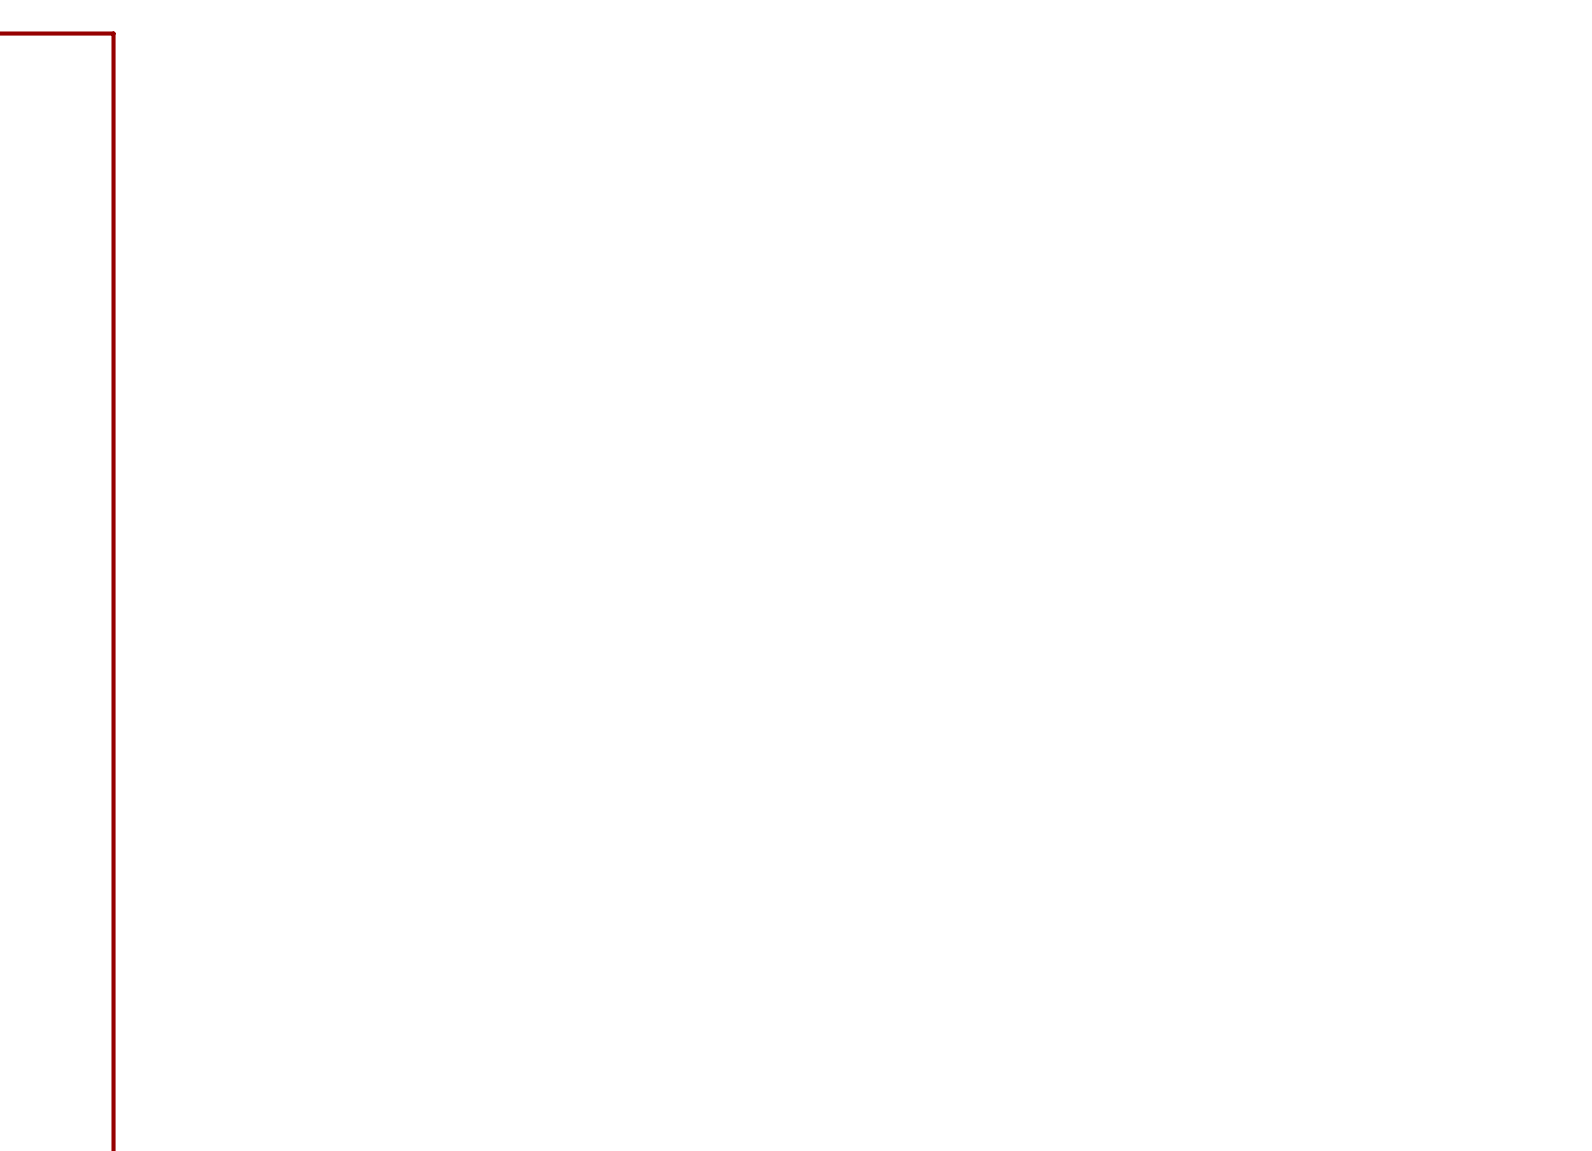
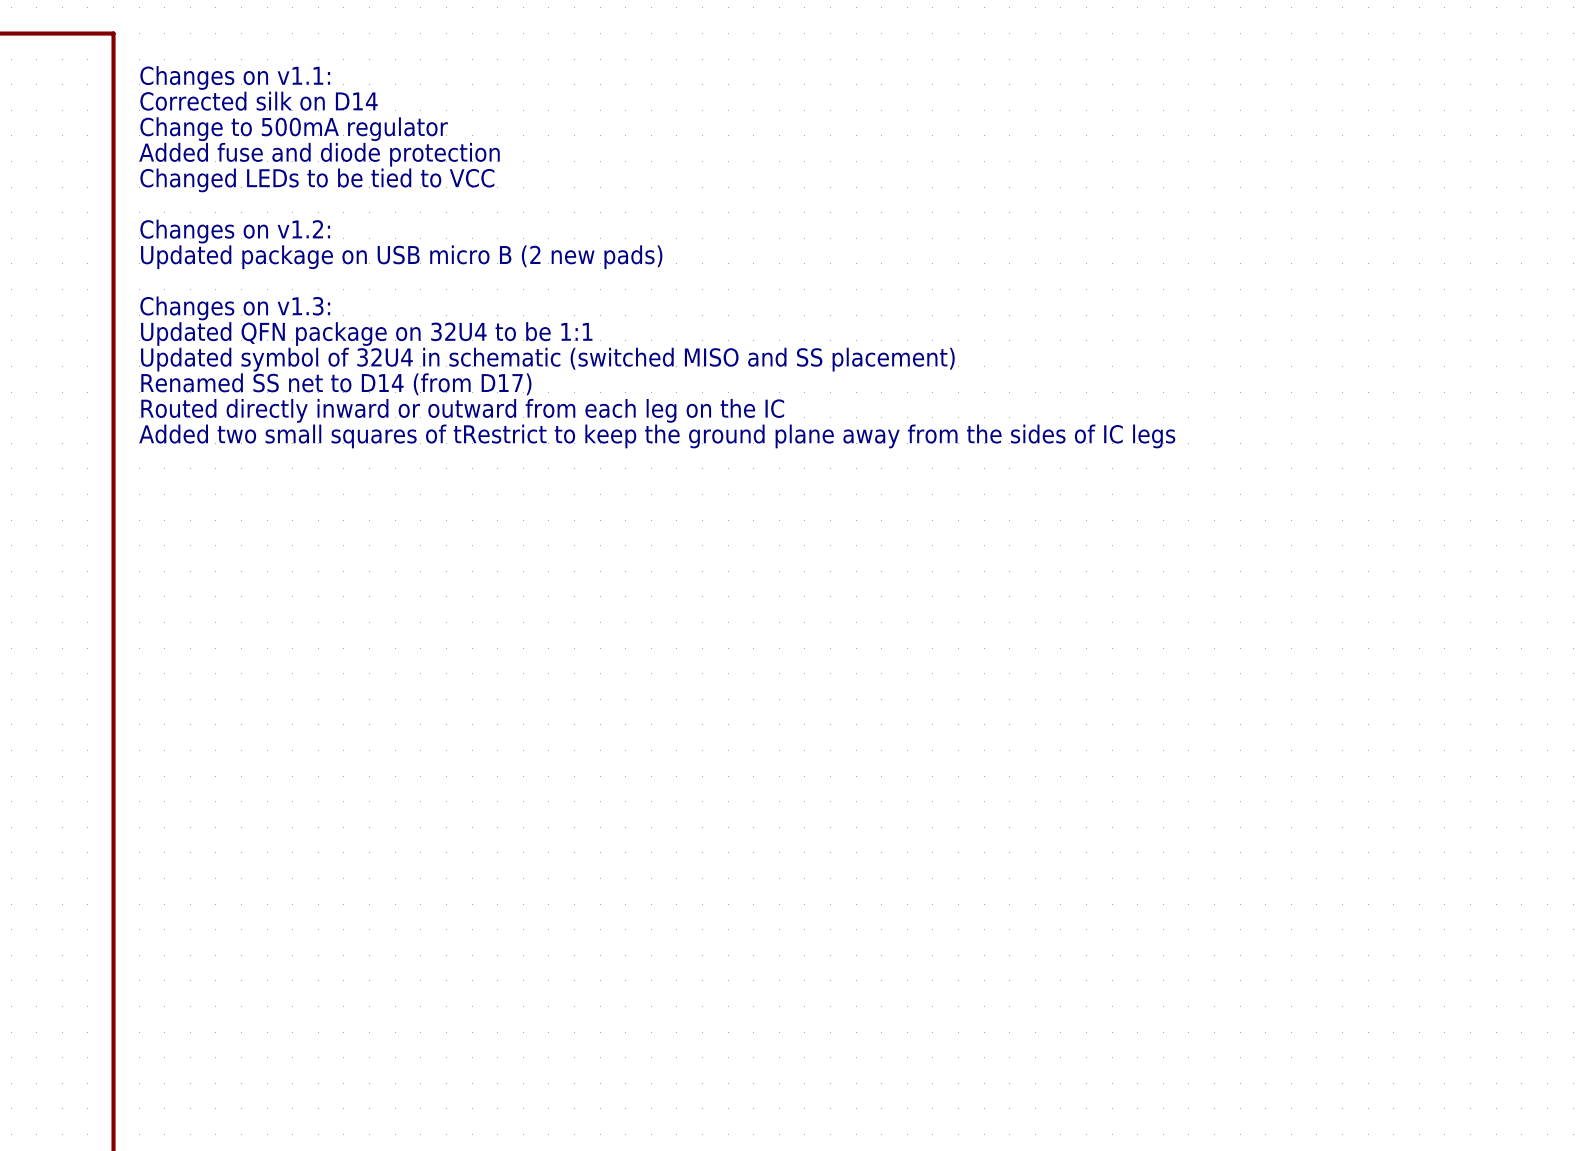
text: none -> Changes on v1.1: (235, 77)
text: none -> Corrected silk on D14 (259, 101)
text: none -> Change to 500mA regulator (294, 129)
text: none -> Added fuse and diode protection (319, 154)
text: none -> Changed LEDs to be tied to VCC (317, 180)
text: none -> Changes on v1.2: (235, 231)
text: none -> Updated package on USB micro B (2 new pads) (401, 257)
text: none -> Changes on v1.3: (235, 308)
text: none -> Updated QFN package on 32U4 to be 1:1 (366, 334)
text: none -> Updated symbol of 32U4 in schematic (switched MISO and SS placement) (547, 359)
text: none -> Renamed SS net to D14 (from D17) (336, 384)
text: none -> Routed directly inward or outward from each leg on the IC (462, 410)
text: none -> Added two small squares of tRestrict to keep the ground plane away from the sides of IC legs (657, 436)

